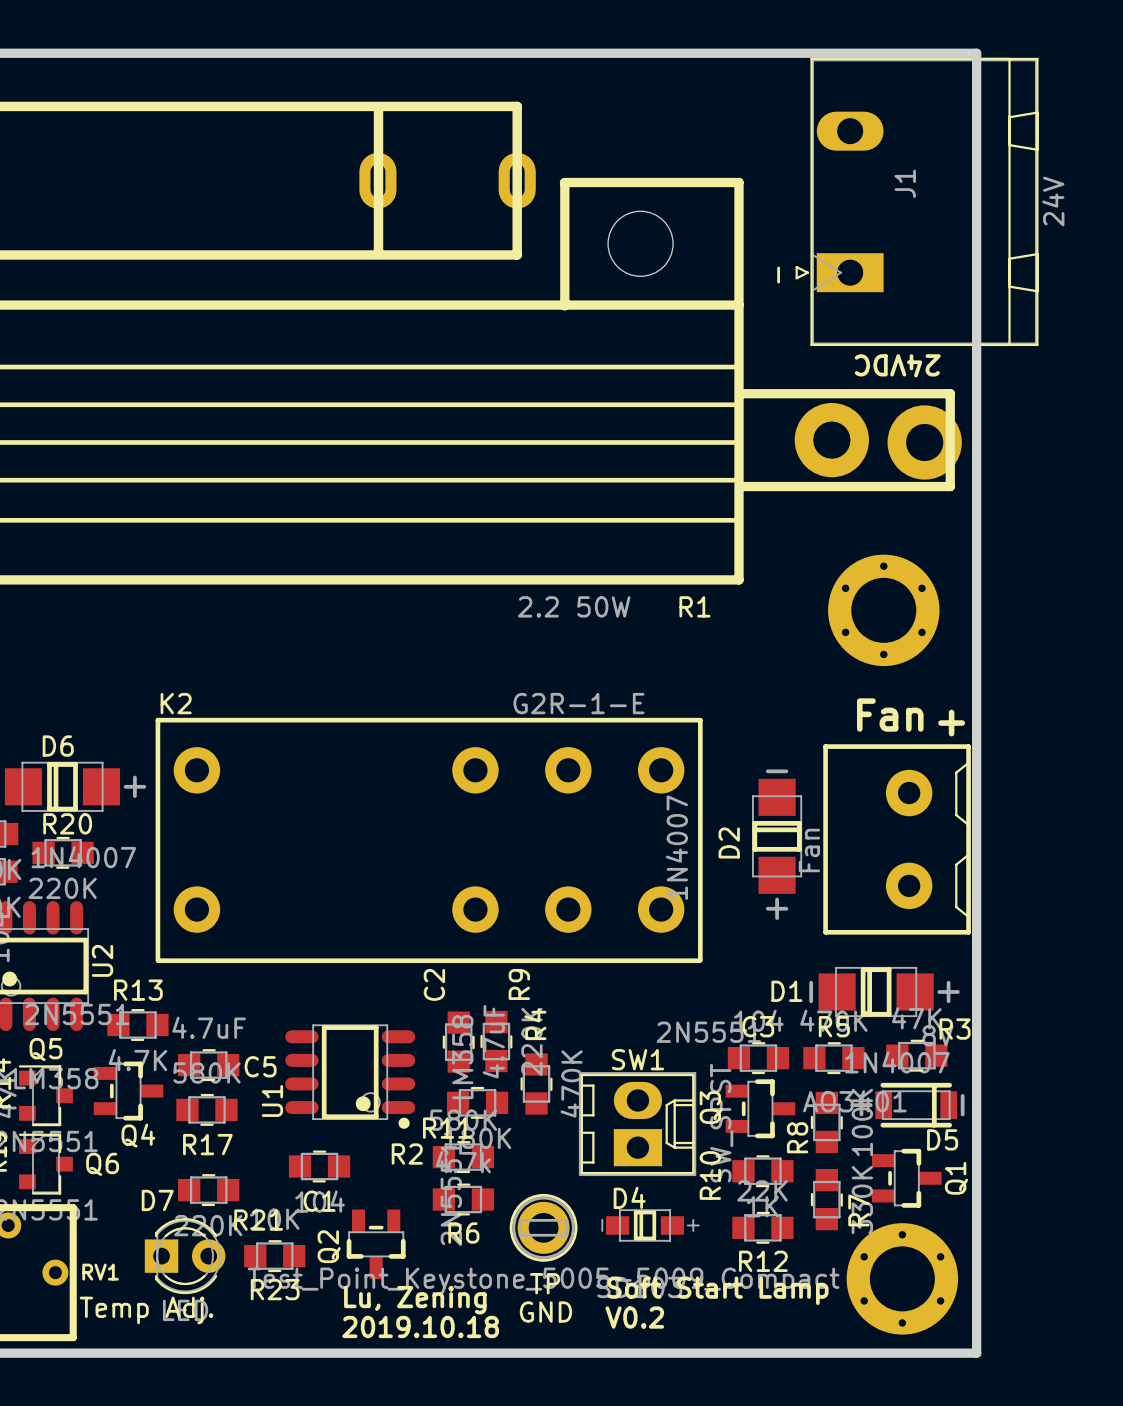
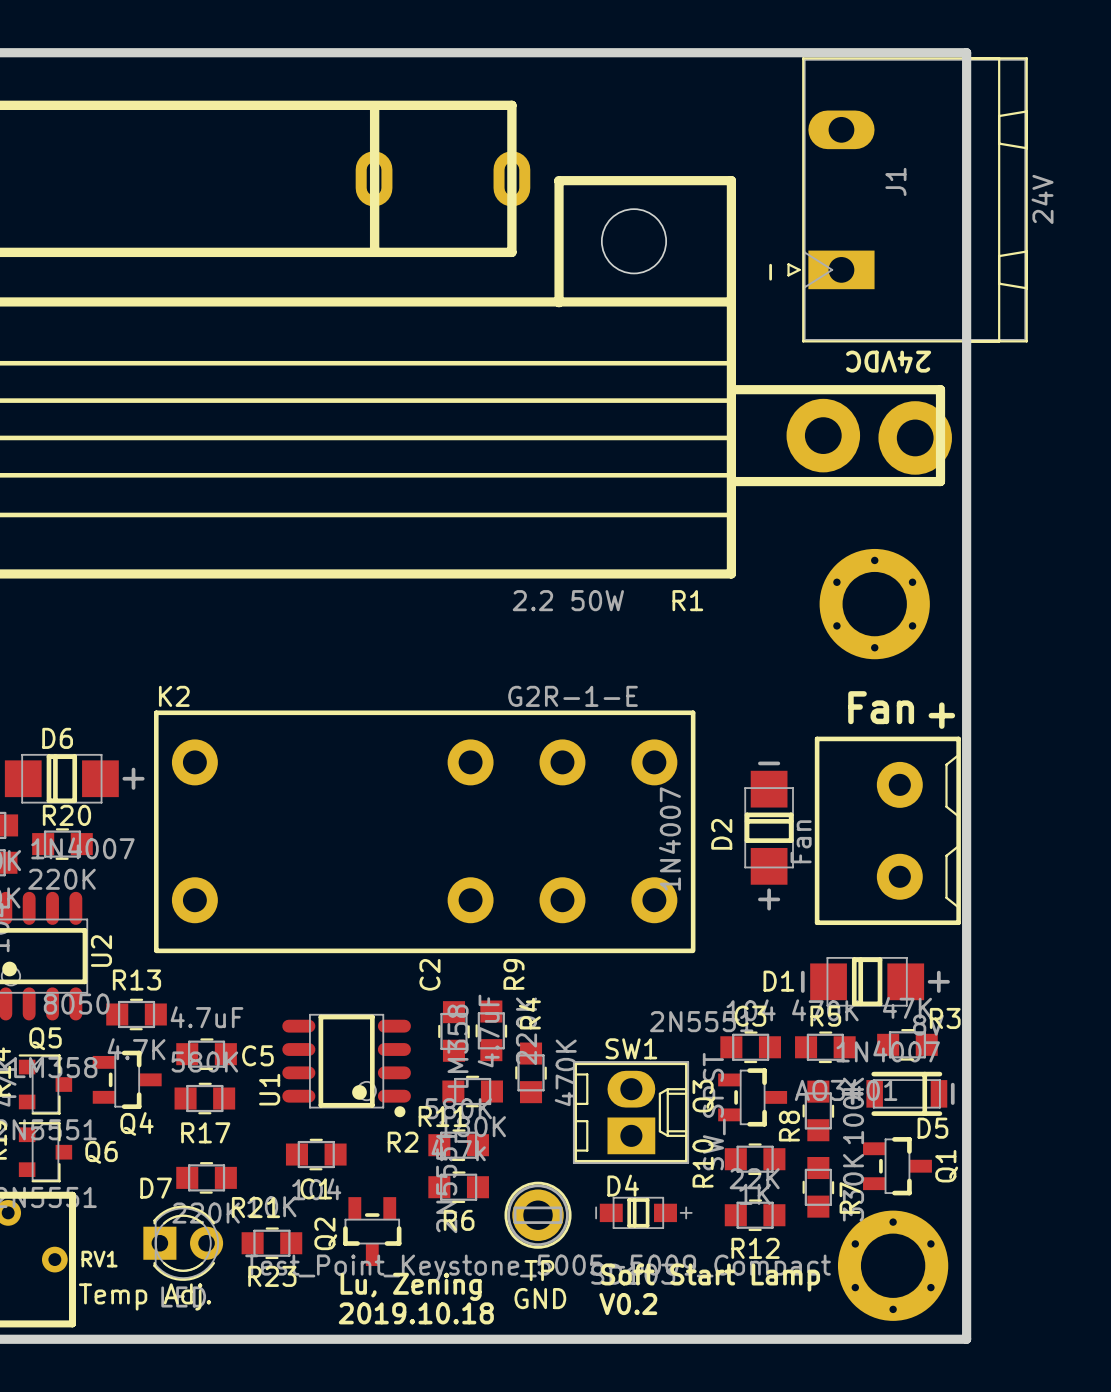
Q4 value: 2N5551 (77, 1014) -> 8050 (76, 1004)

